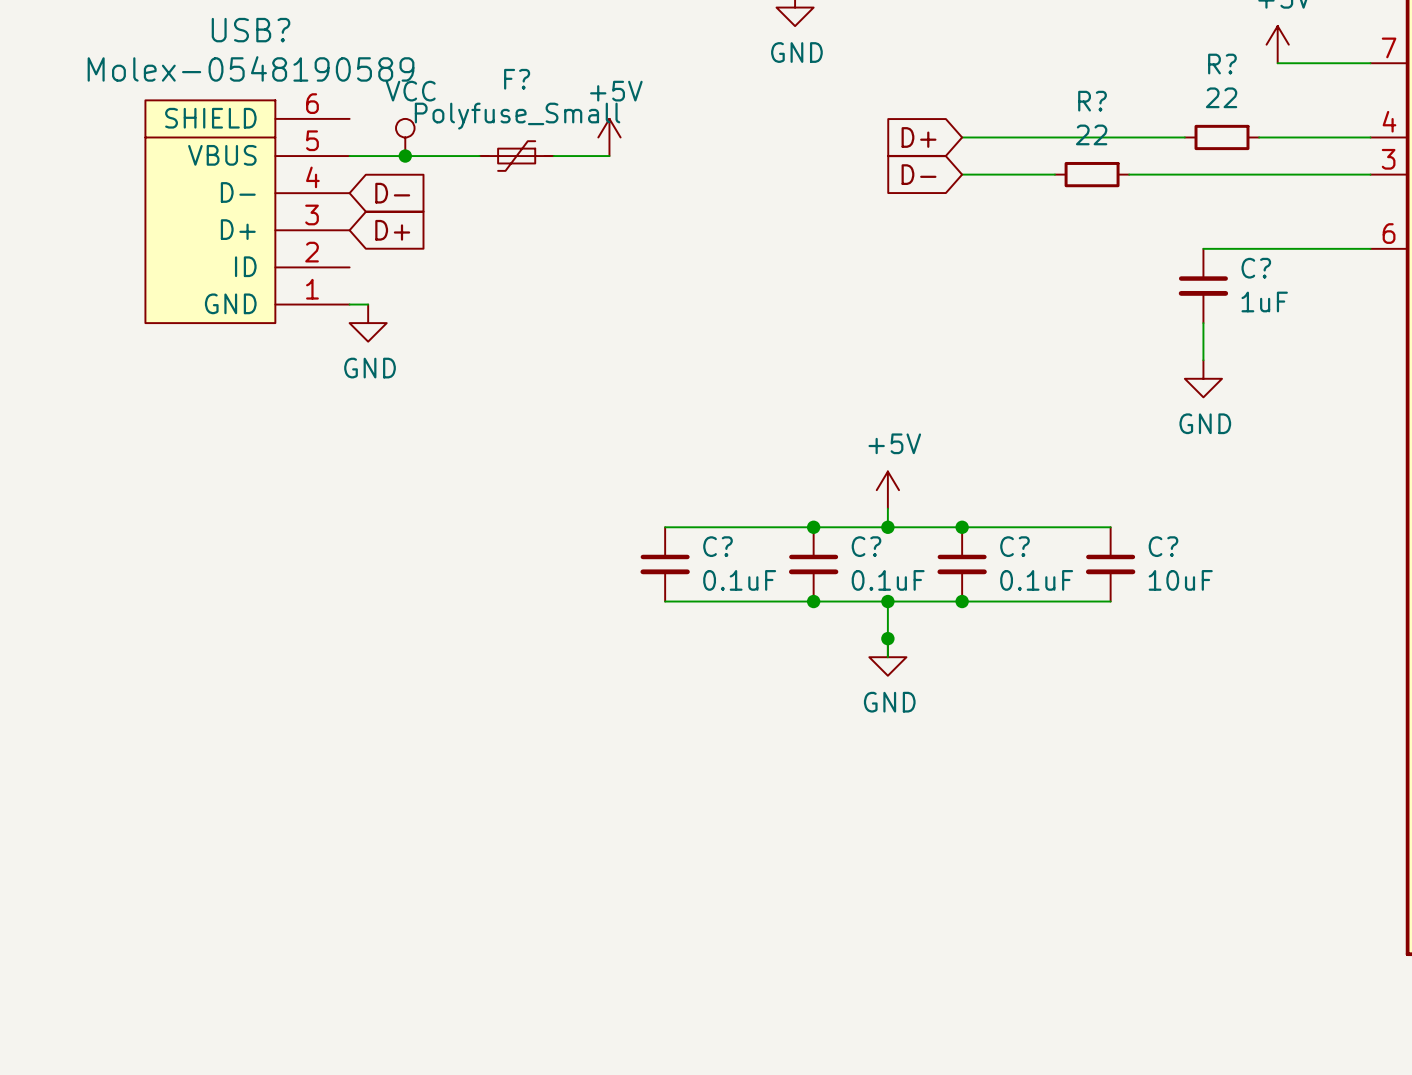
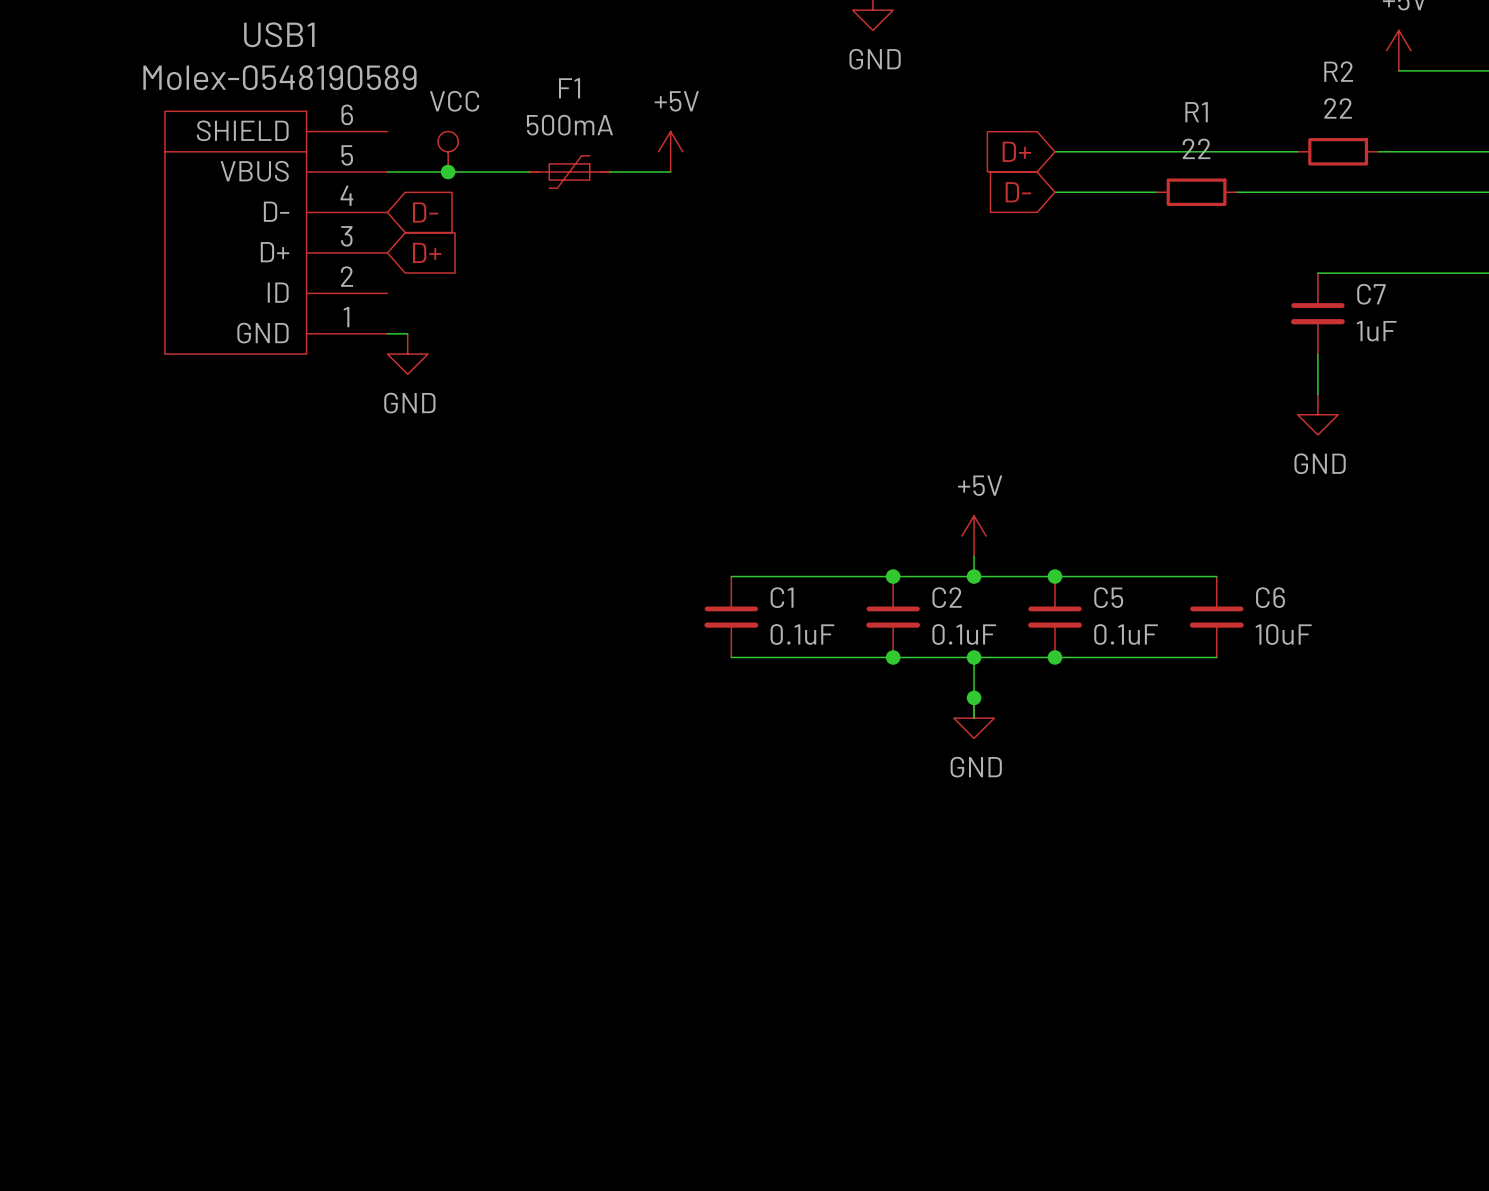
USB? name: USB? (251, 30) -> USB1 (279, 34)
R? name: R? (1222, 64) -> R2 (1338, 71)
F? name: F? (517, 79) -> F1 (569, 88)
R? name: R? (1092, 101) -> R1 (1196, 112)
F? value: Polyfuse_Small (517, 116) -> 500mA (569, 125)
C? name: C? (1256, 268) -> C7 (1371, 294)
C? name: C? (718, 546) -> C1 (782, 597)
C? name: C? (866, 546) -> C2 (947, 597)
C? name: C? (1014, 546) -> C5 (1108, 597)
C? name: C? (1163, 546) -> C6 (1270, 597)

